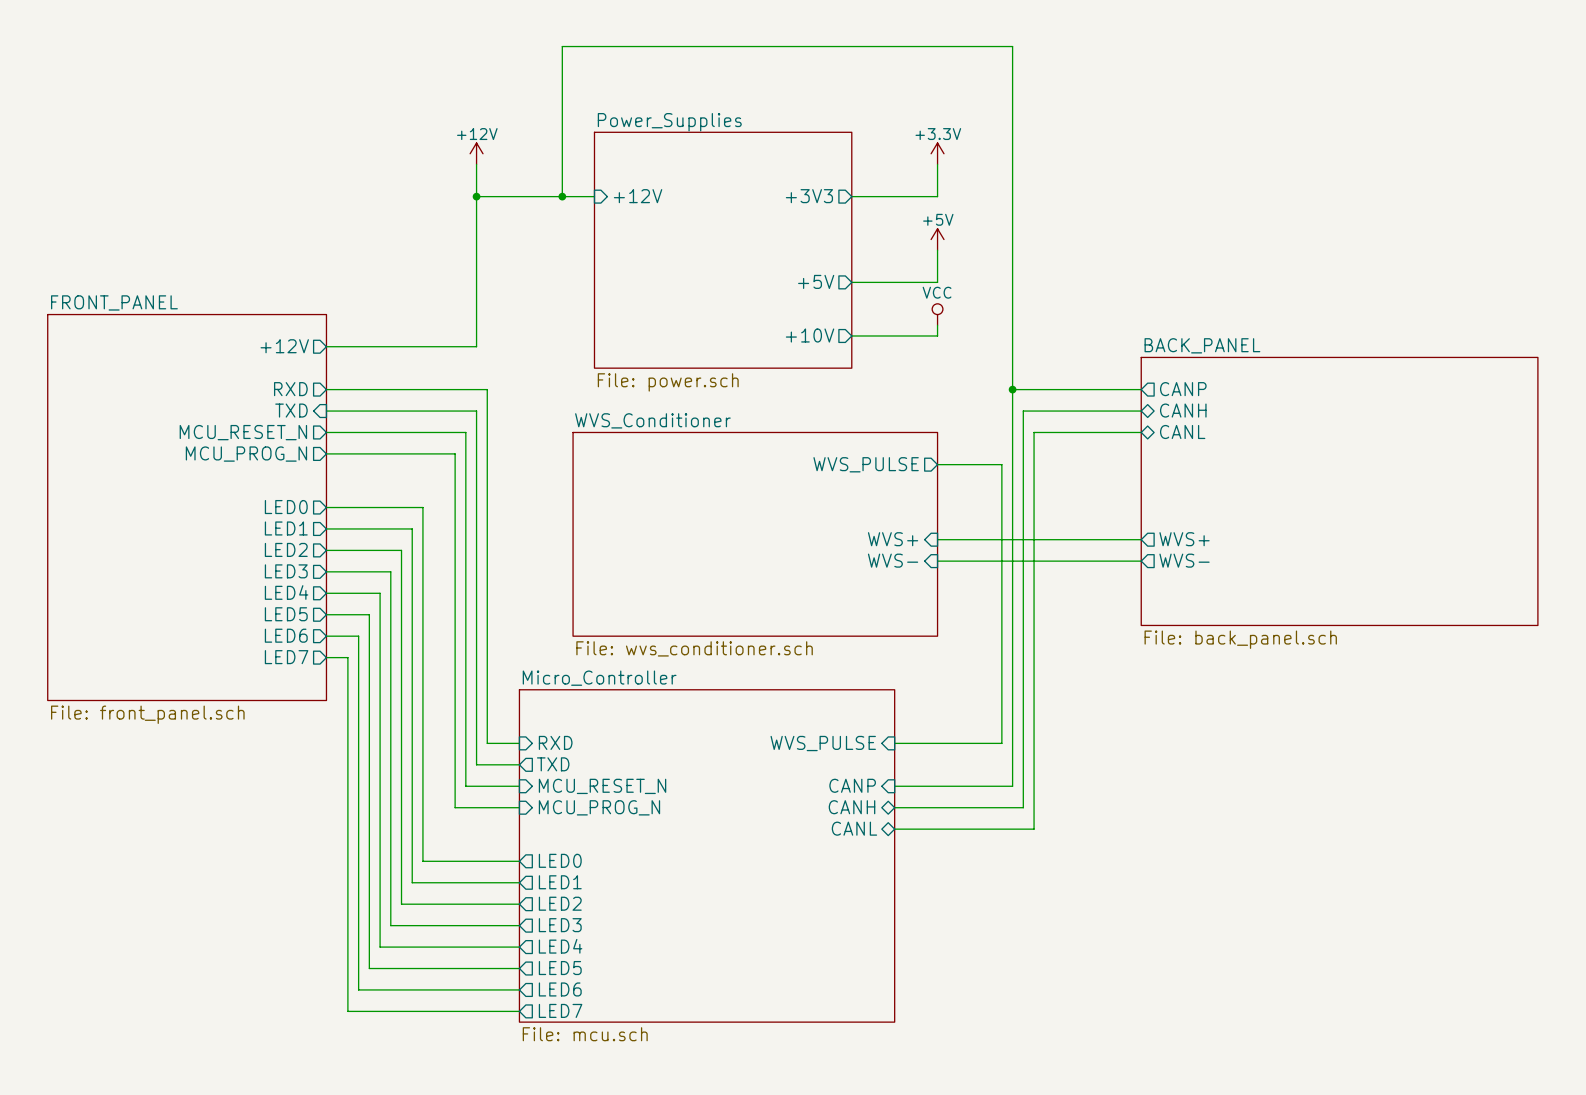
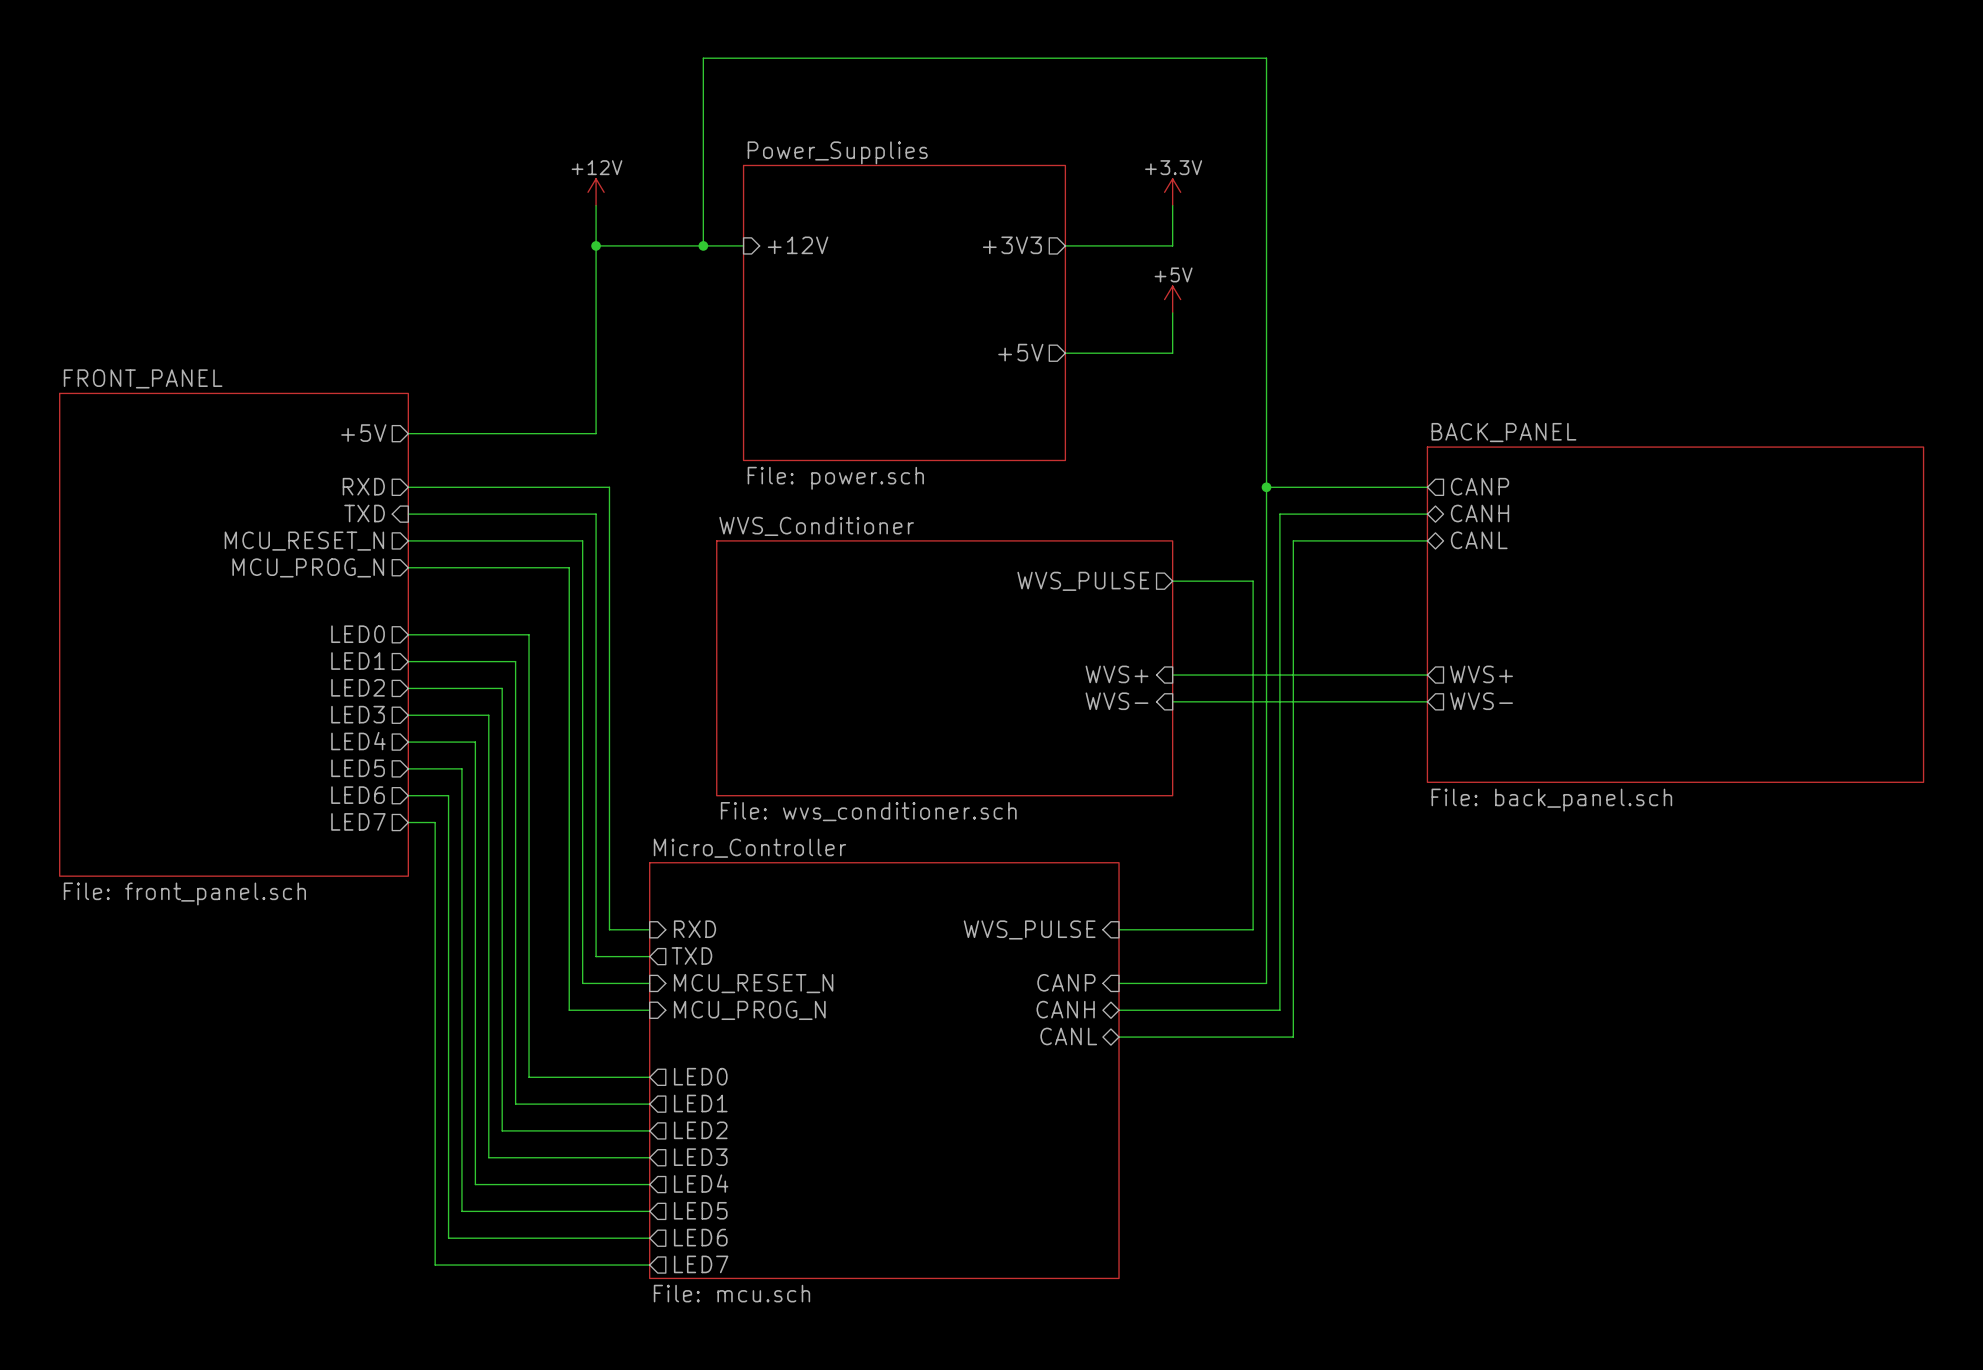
power symbol: VCC (937, 314) -> none
wire: (937, 325) (937, 335) (851, 335) -> none
sheet pin: +10V (810, 335) -> none
sheet pin: +12V (284, 346) -> +5V (363, 433)

